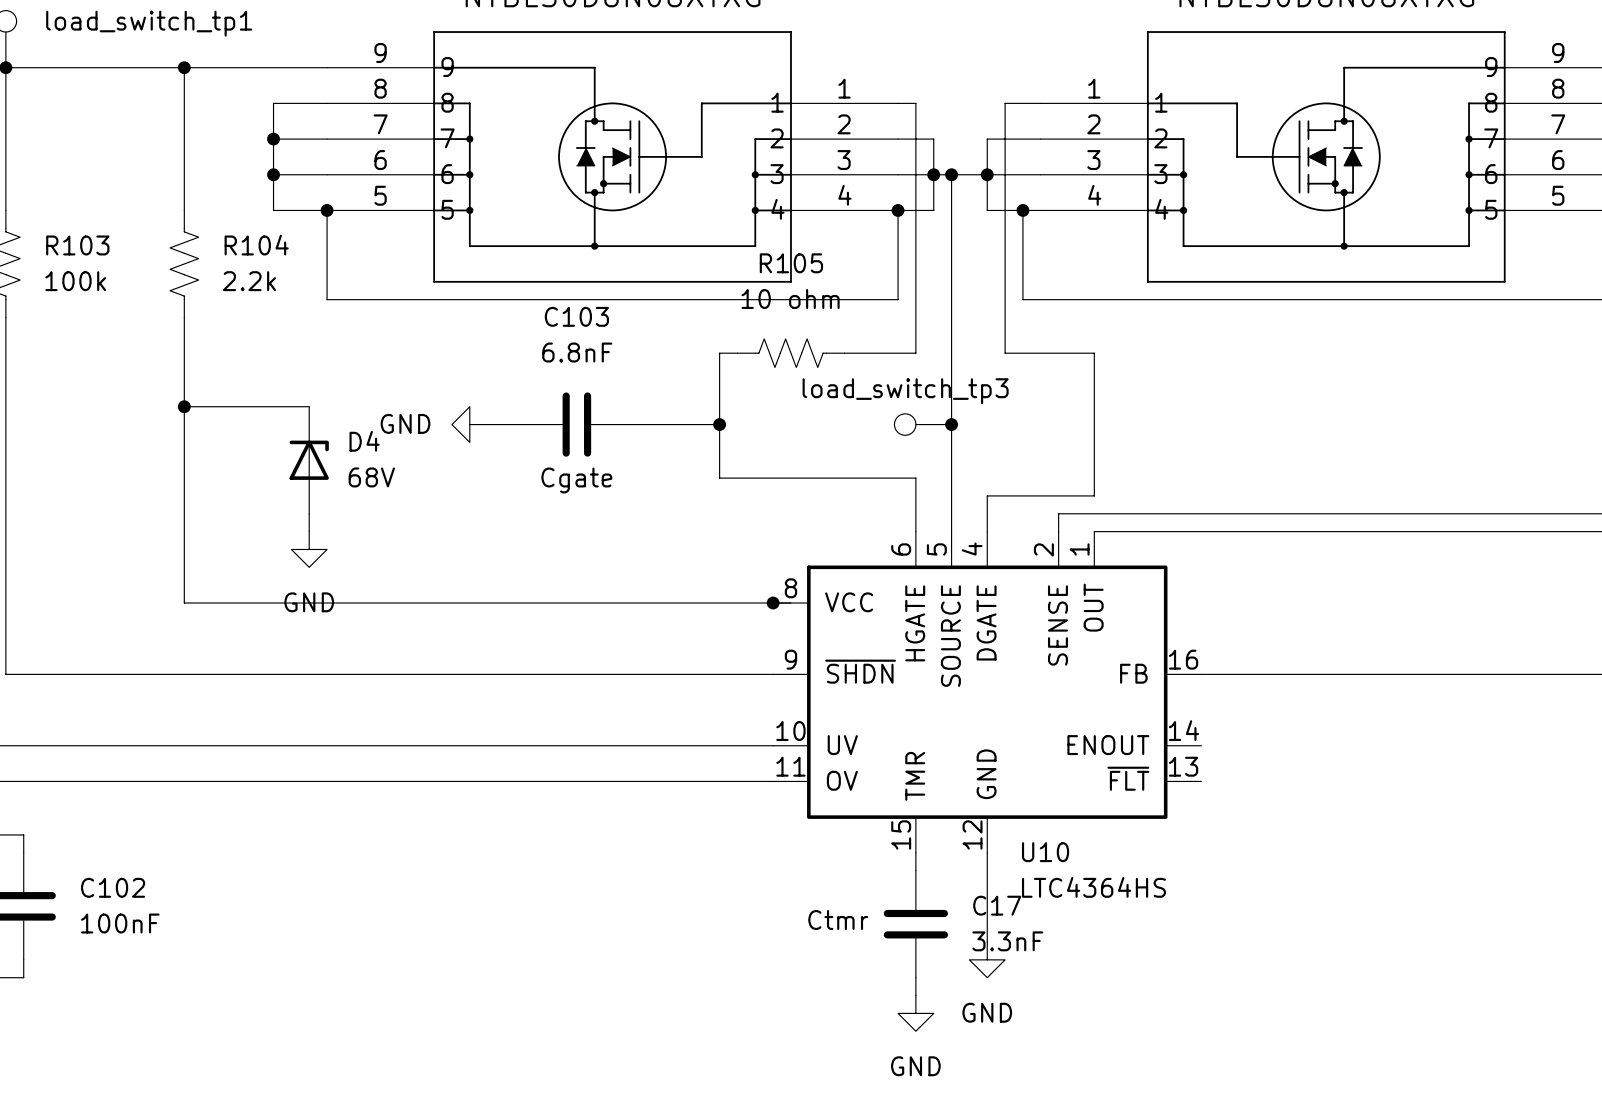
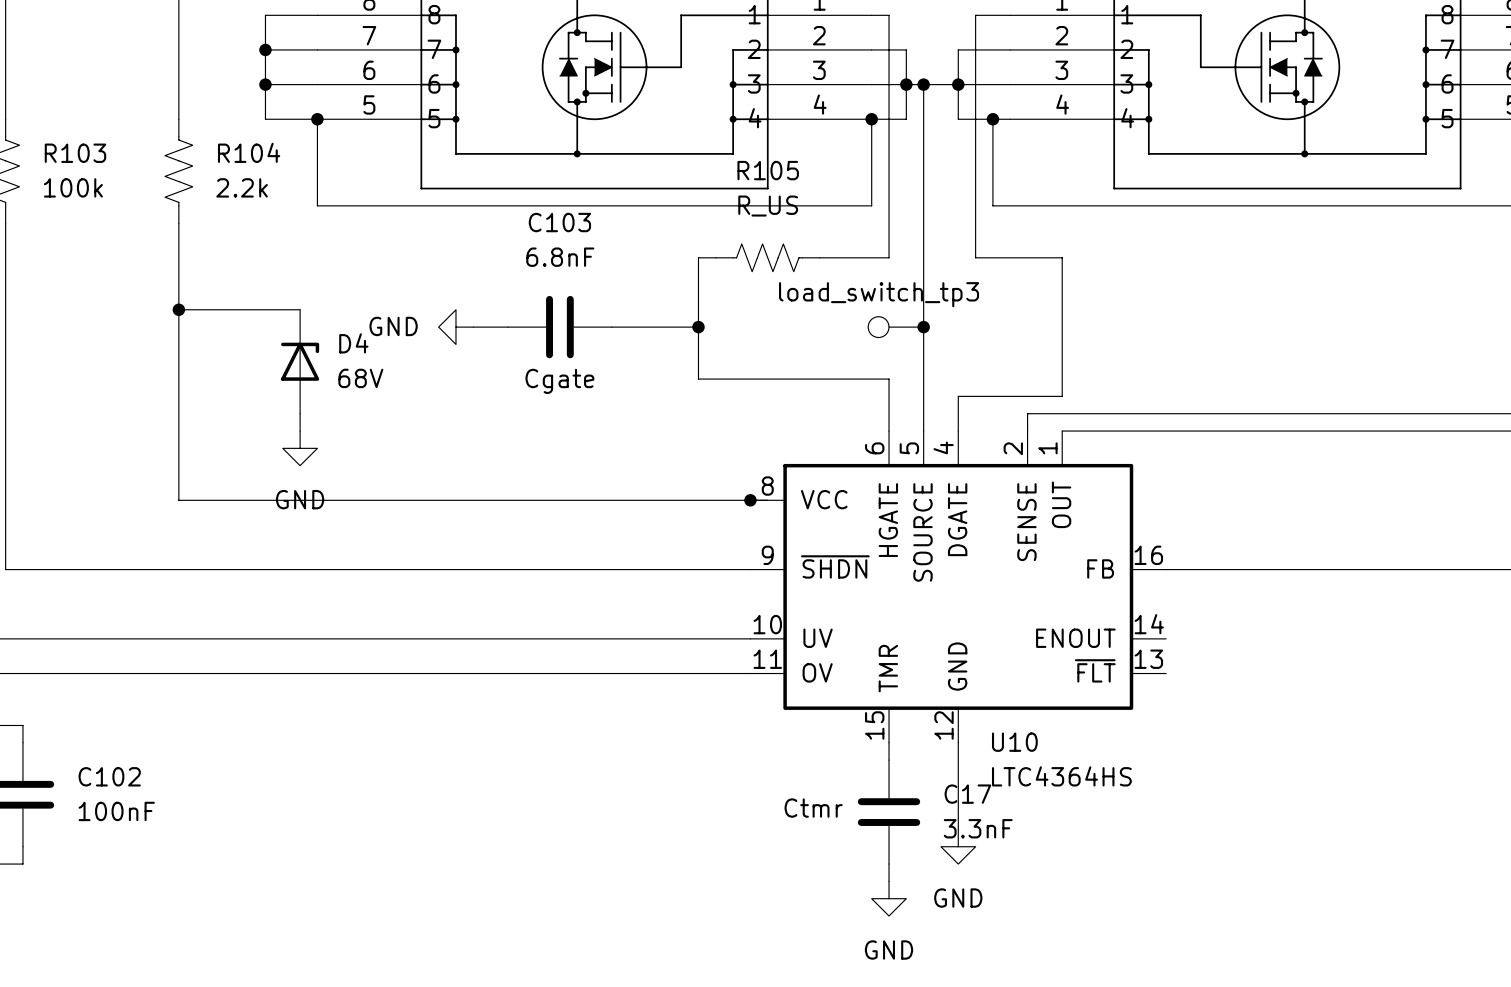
R105 value: 10 ohm (790, 299) -> R_US (768, 206)

